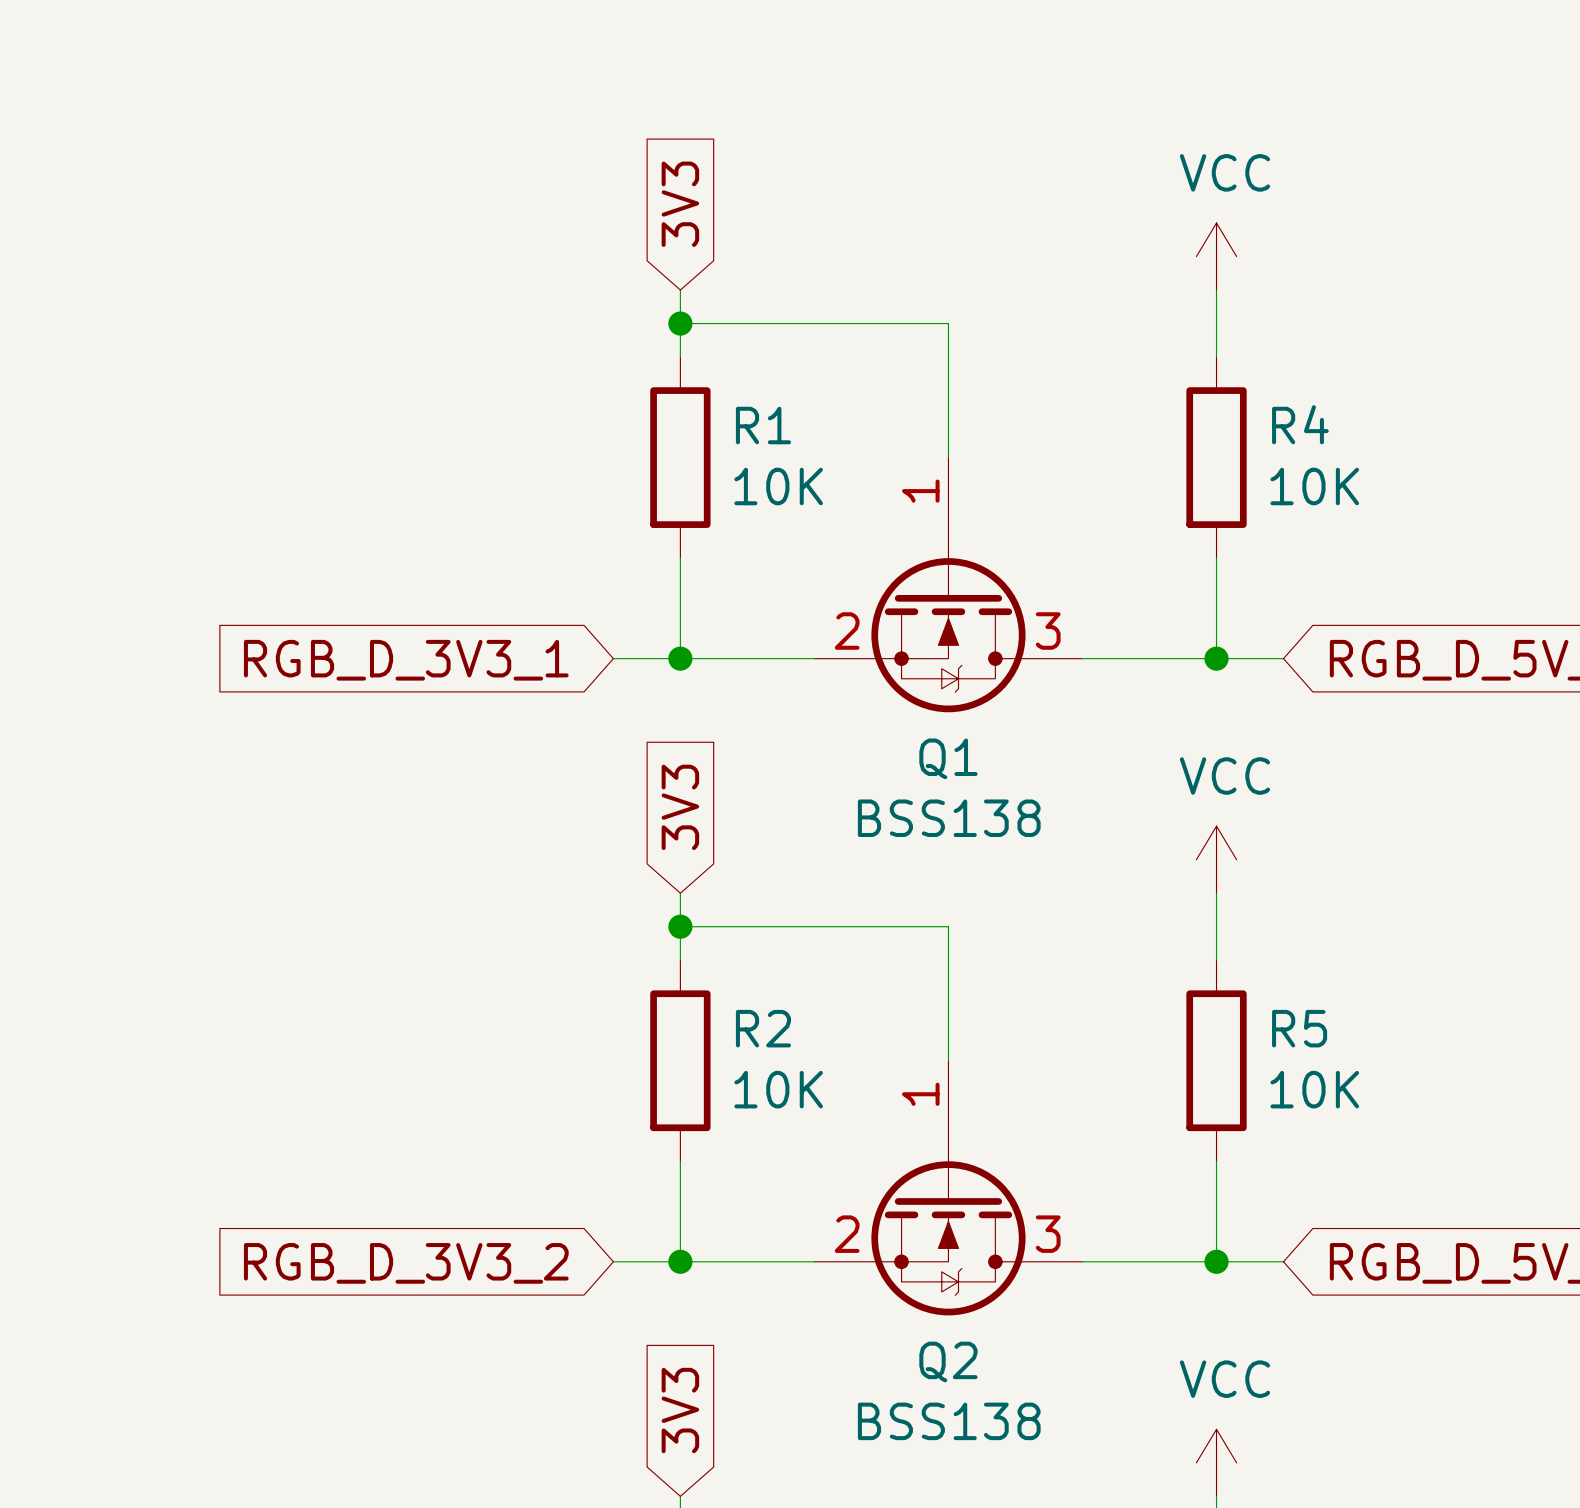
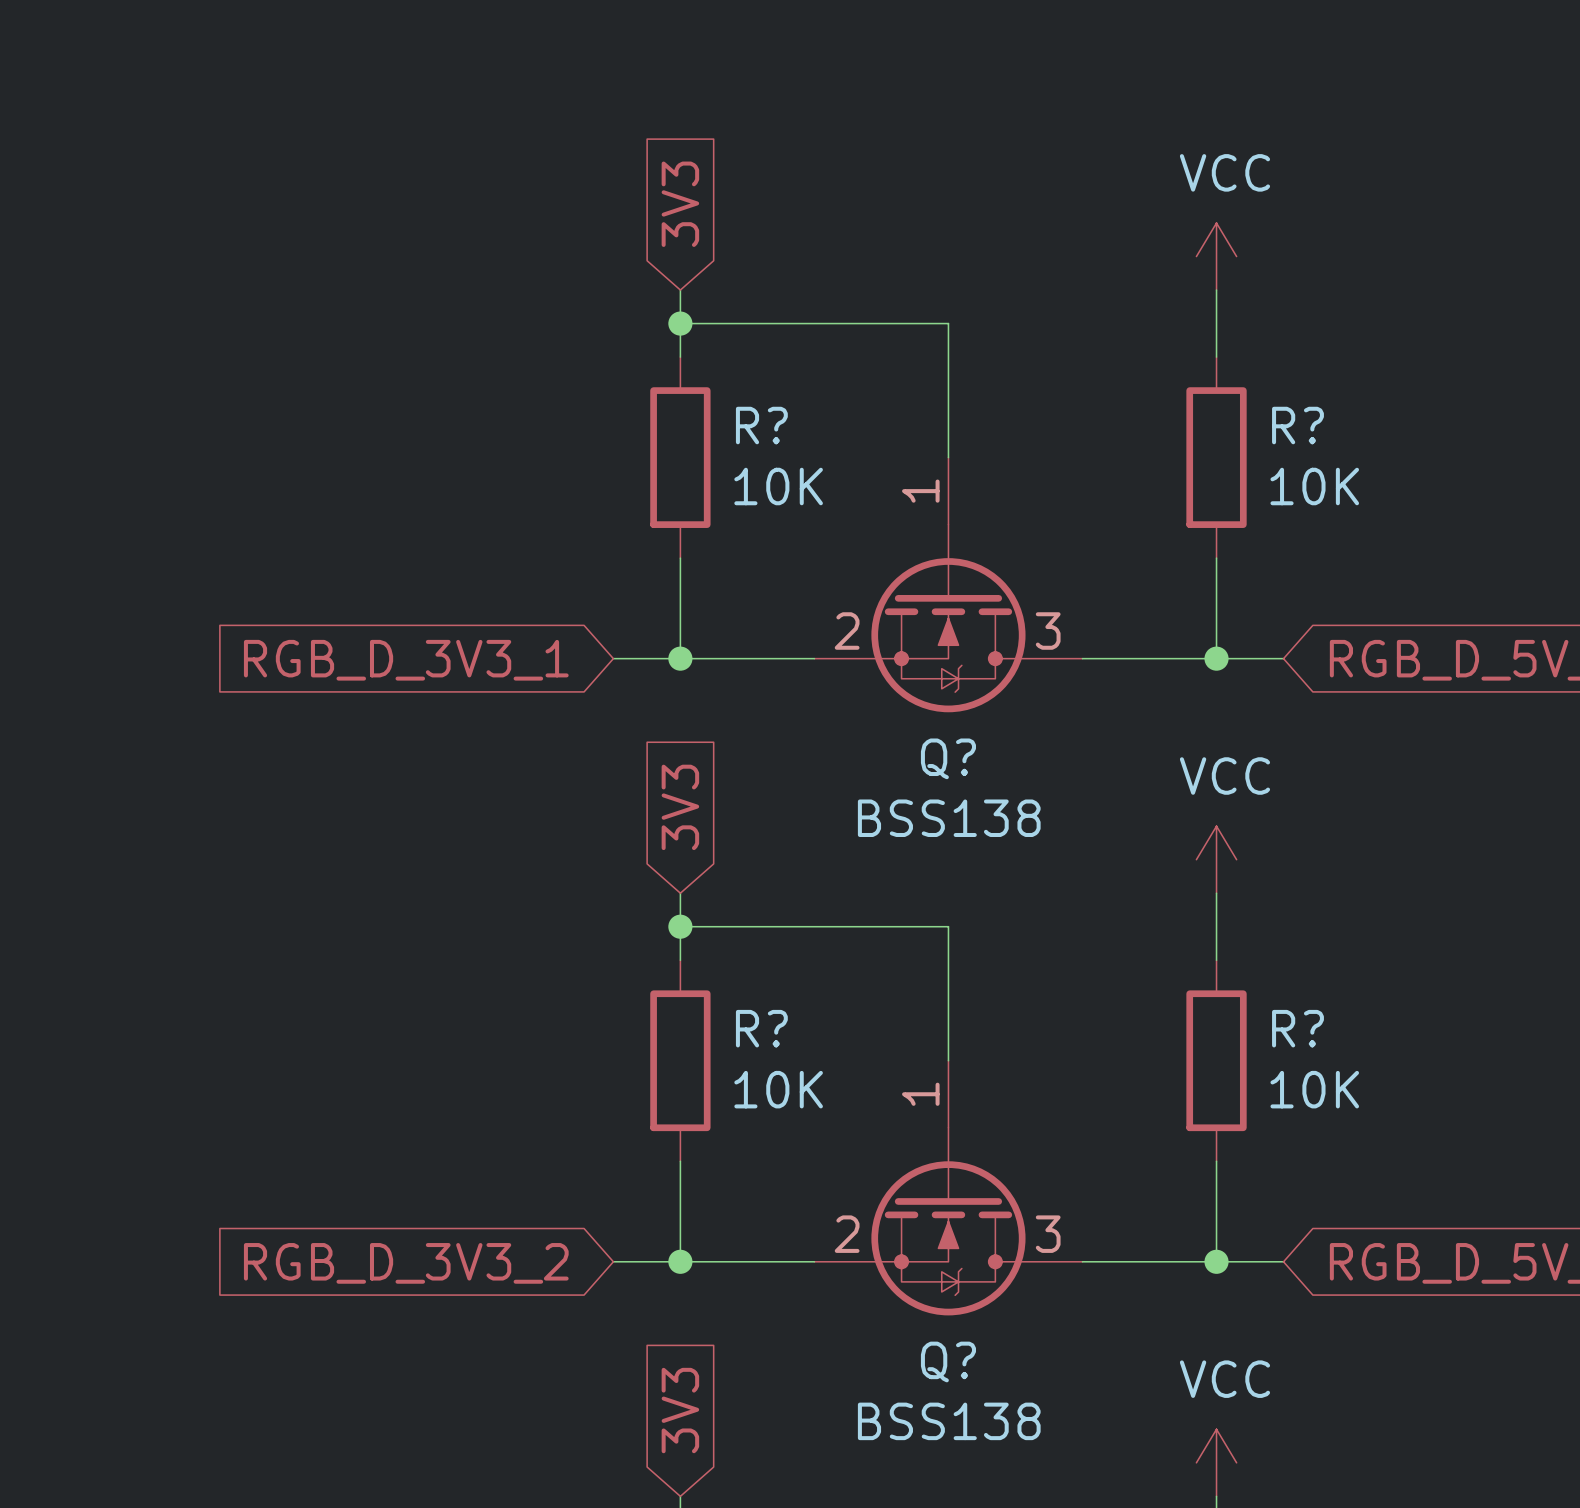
R4 name: R4 (1300, 424) -> R? (1297, 425)
R1 name: R1 (763, 425) -> R? (761, 425)
Q1 name: Q1 (948, 758) -> Q? (948, 758)
R2 name: R2 (763, 1028) -> R? (761, 1028)
R5 name: R5 (1299, 1028) -> R? (1297, 1028)
Q2 name: Q2 (948, 1361) -> Q? (948, 1361)

